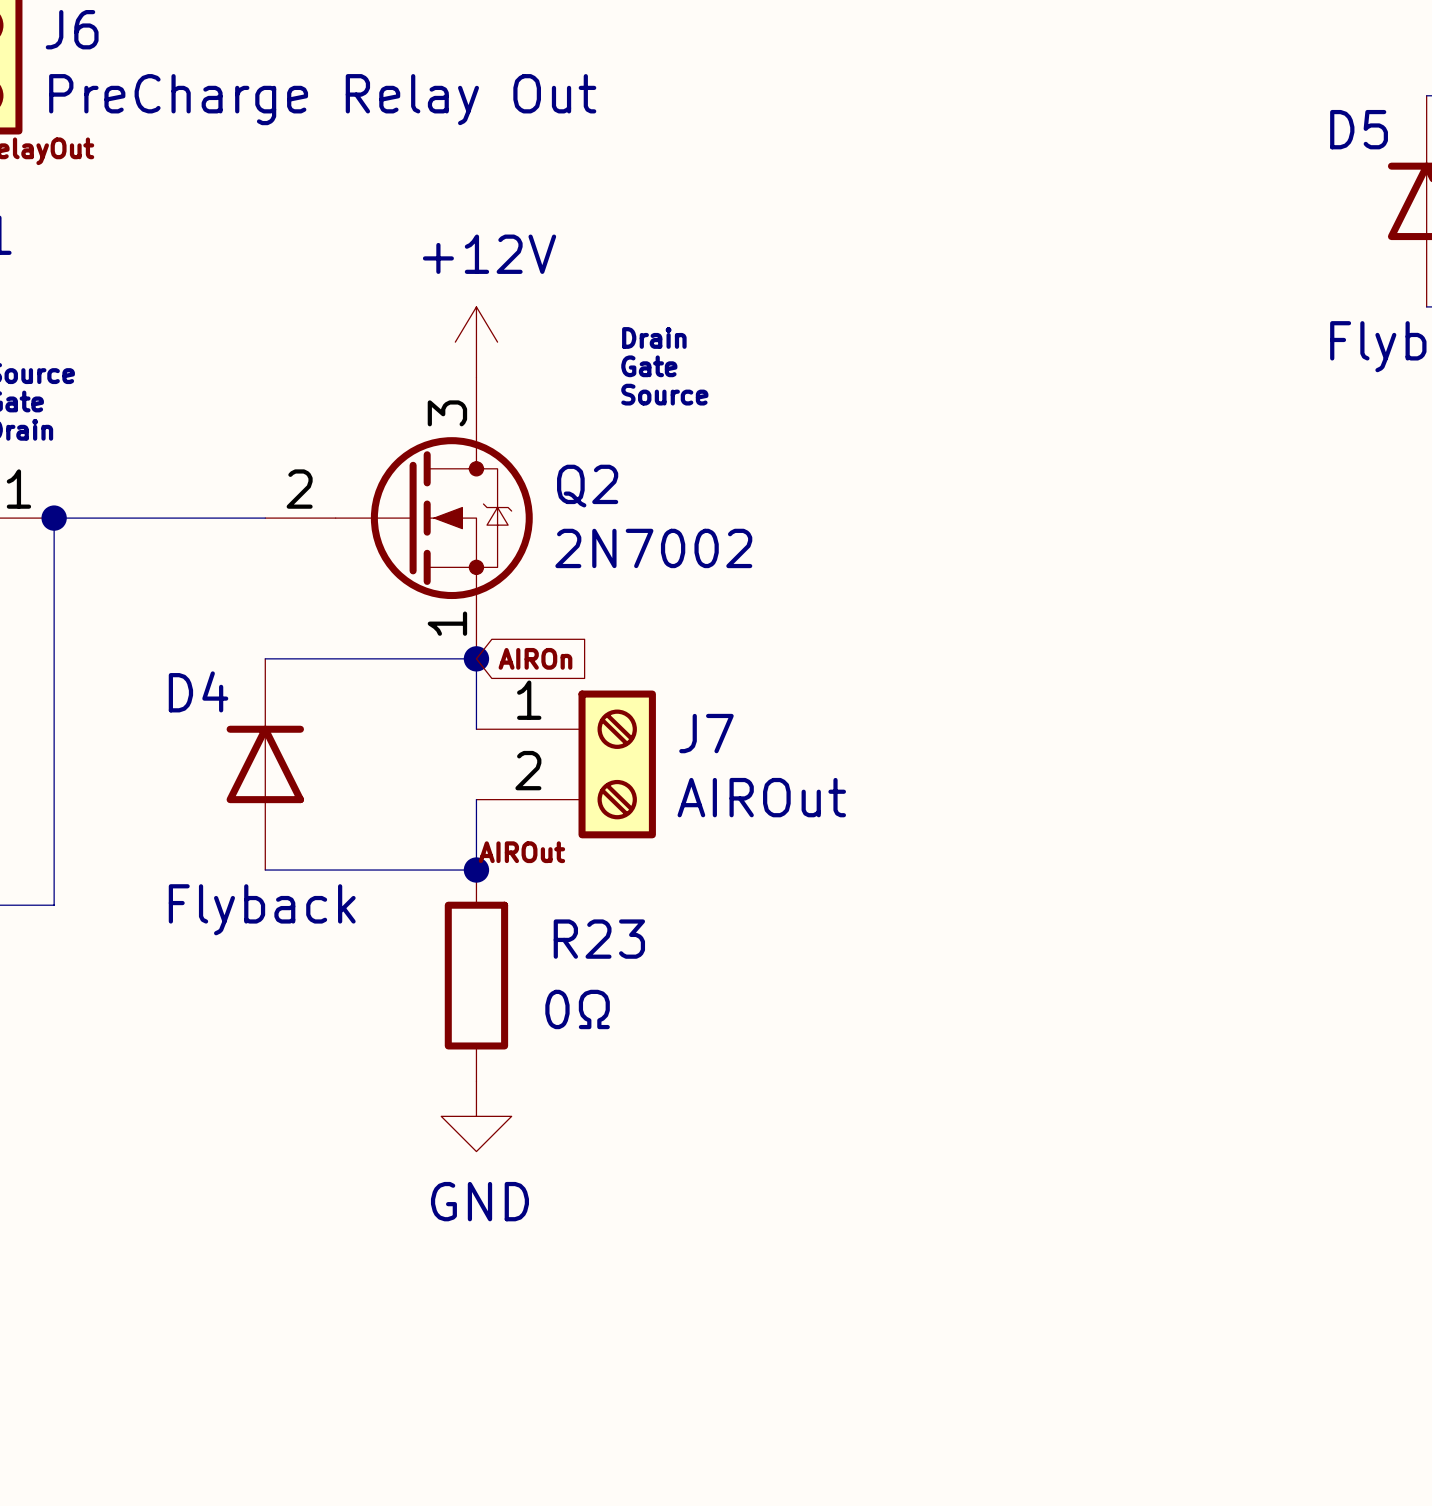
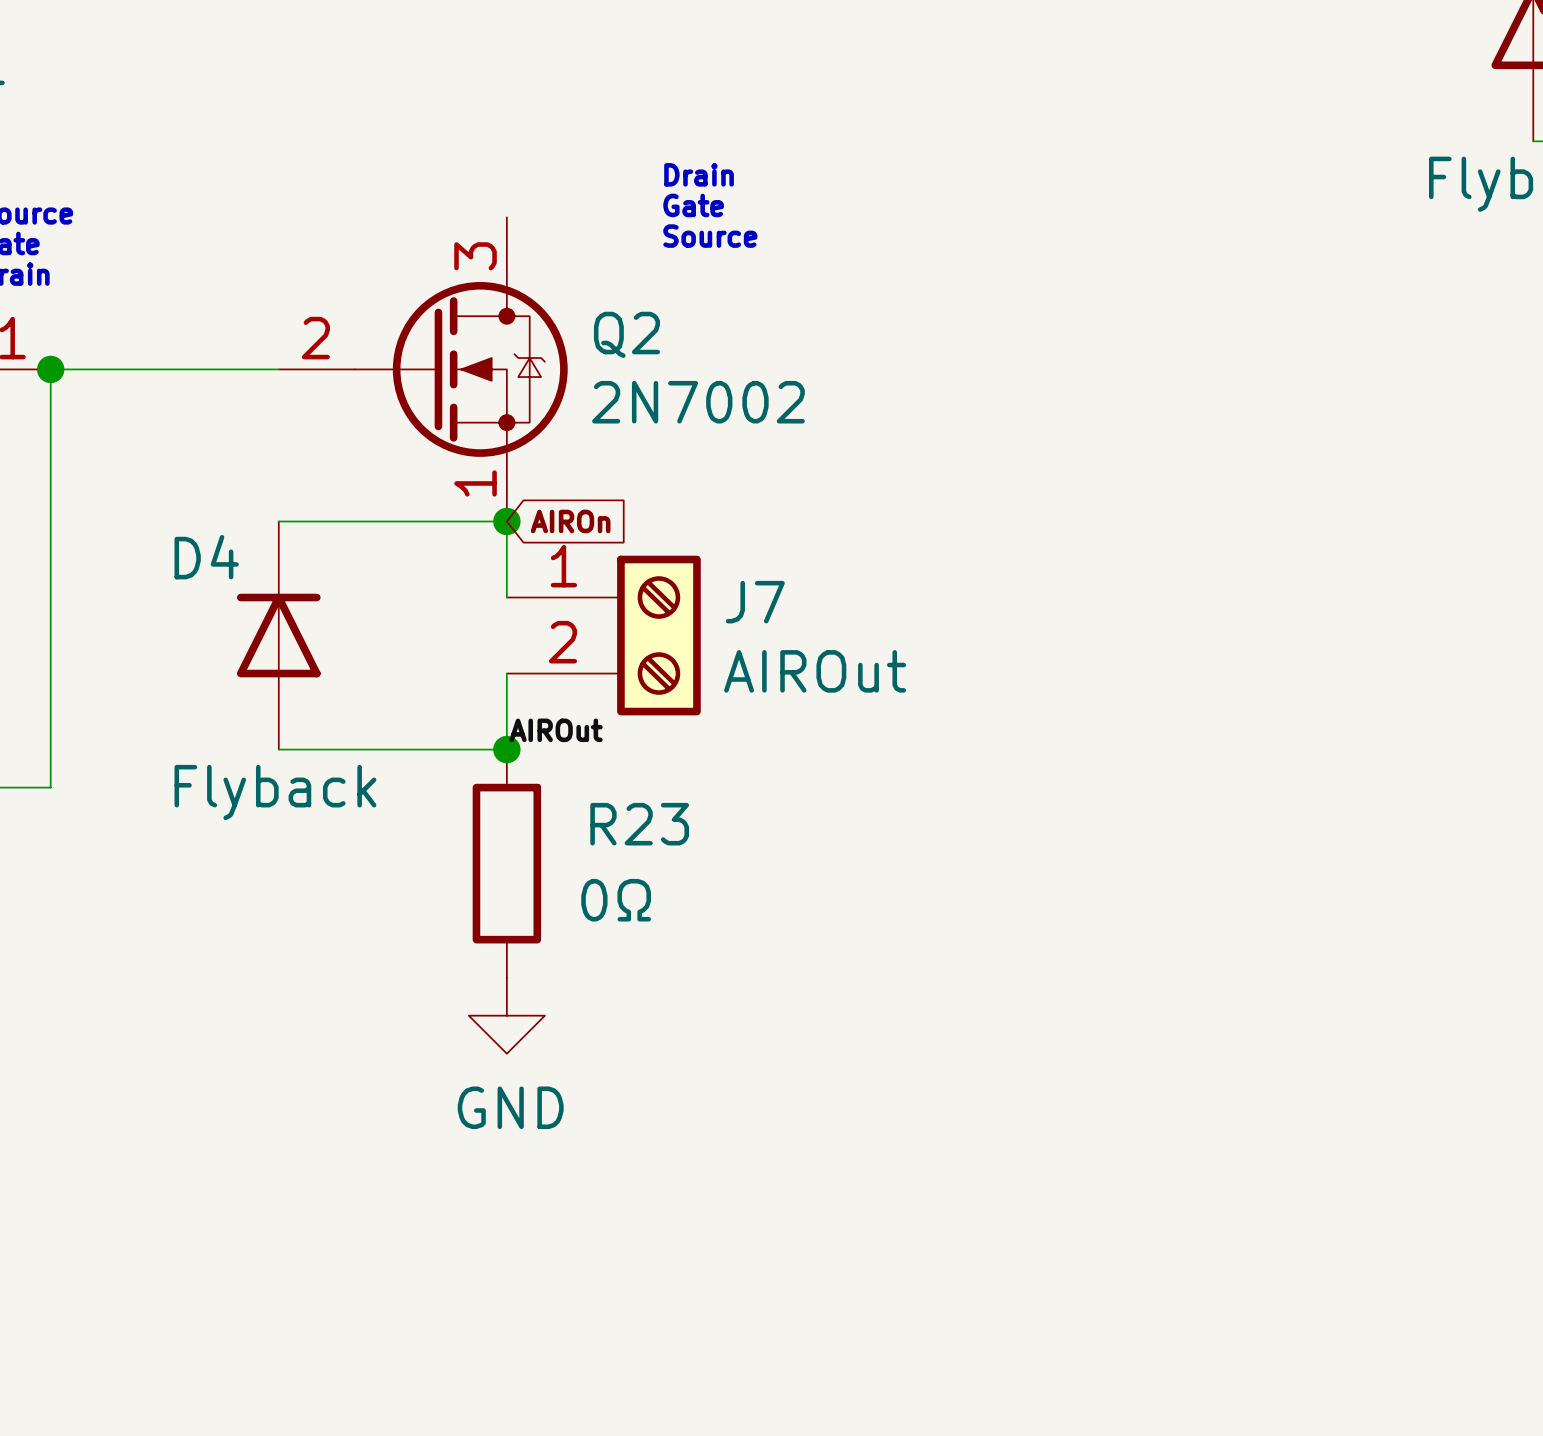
power symbol: +12V (476, 342) -> none

